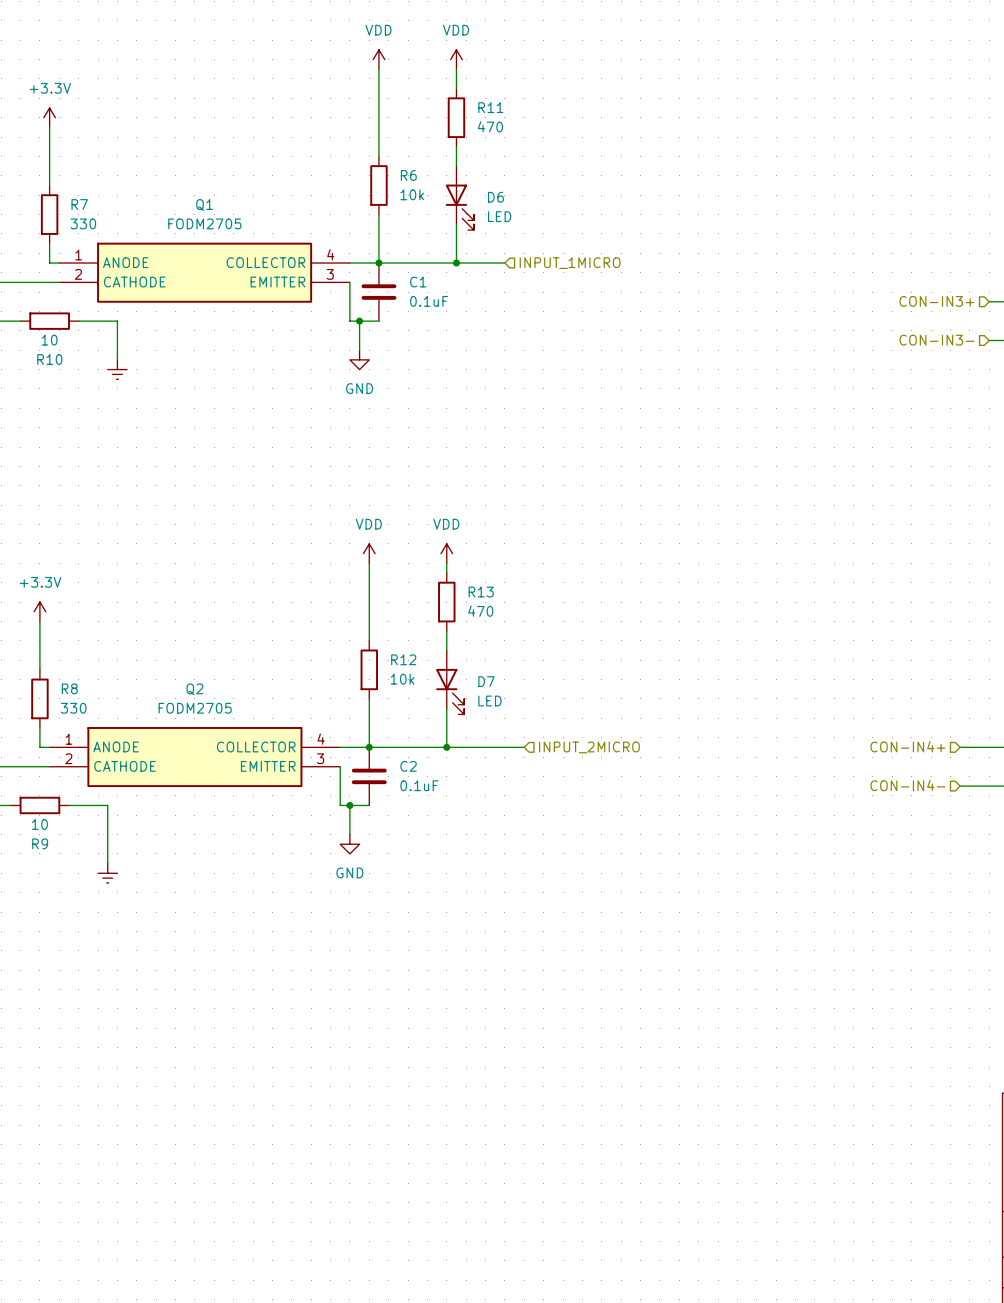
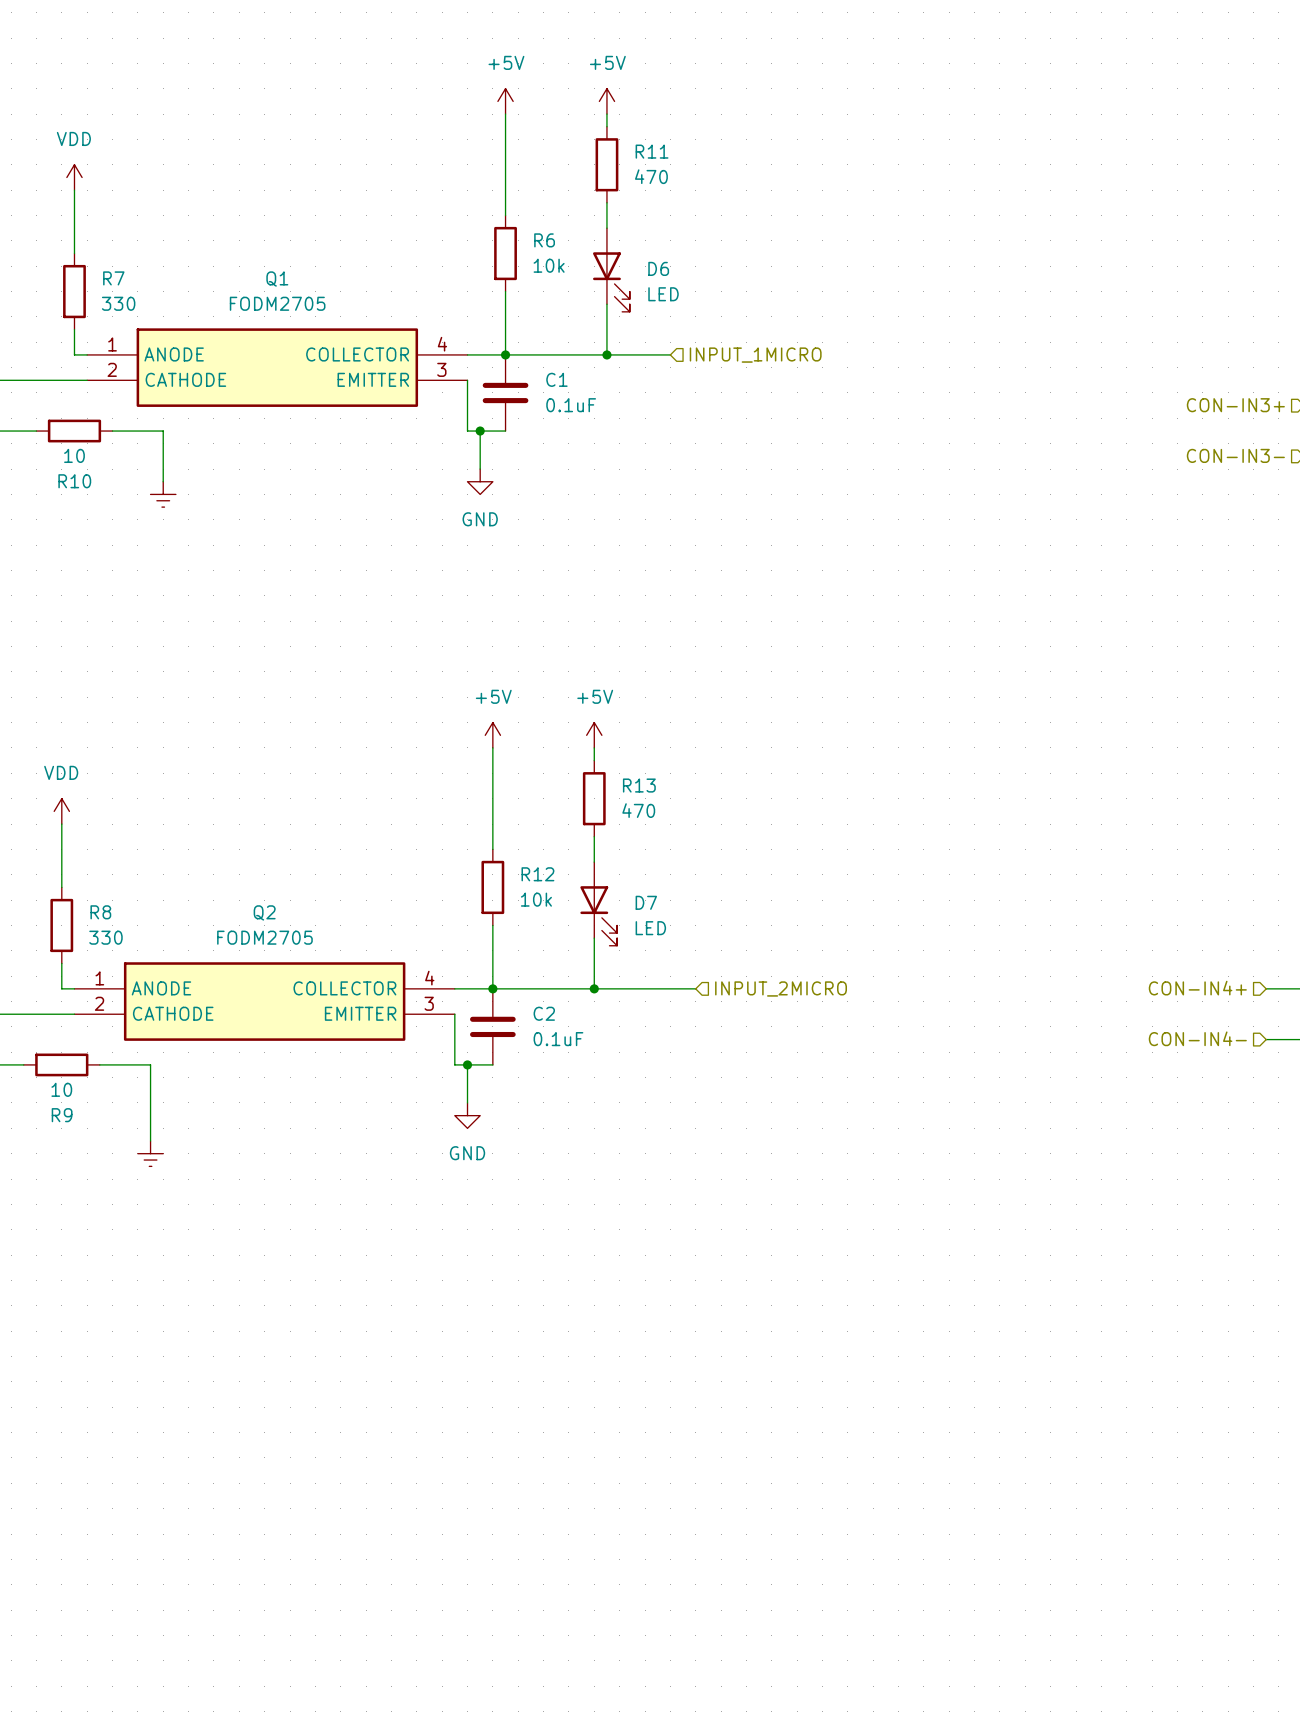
power symbol: VDD (378, 59) -> none
power symbol: VDD (456, 59) -> none
power symbol: none -> +5V (505, 101)
power symbol: none -> +5V (606, 101)
power symbol: +3.3V (49, 117) -> none
power symbol: none -> VDD (74, 177)
power symbol: VDD (369, 553) -> +5V (492, 735)
power symbol: VDD (446, 553) -> +5V (594, 735)
power symbol: +3.3V (39, 611) -> VDD (61, 811)

